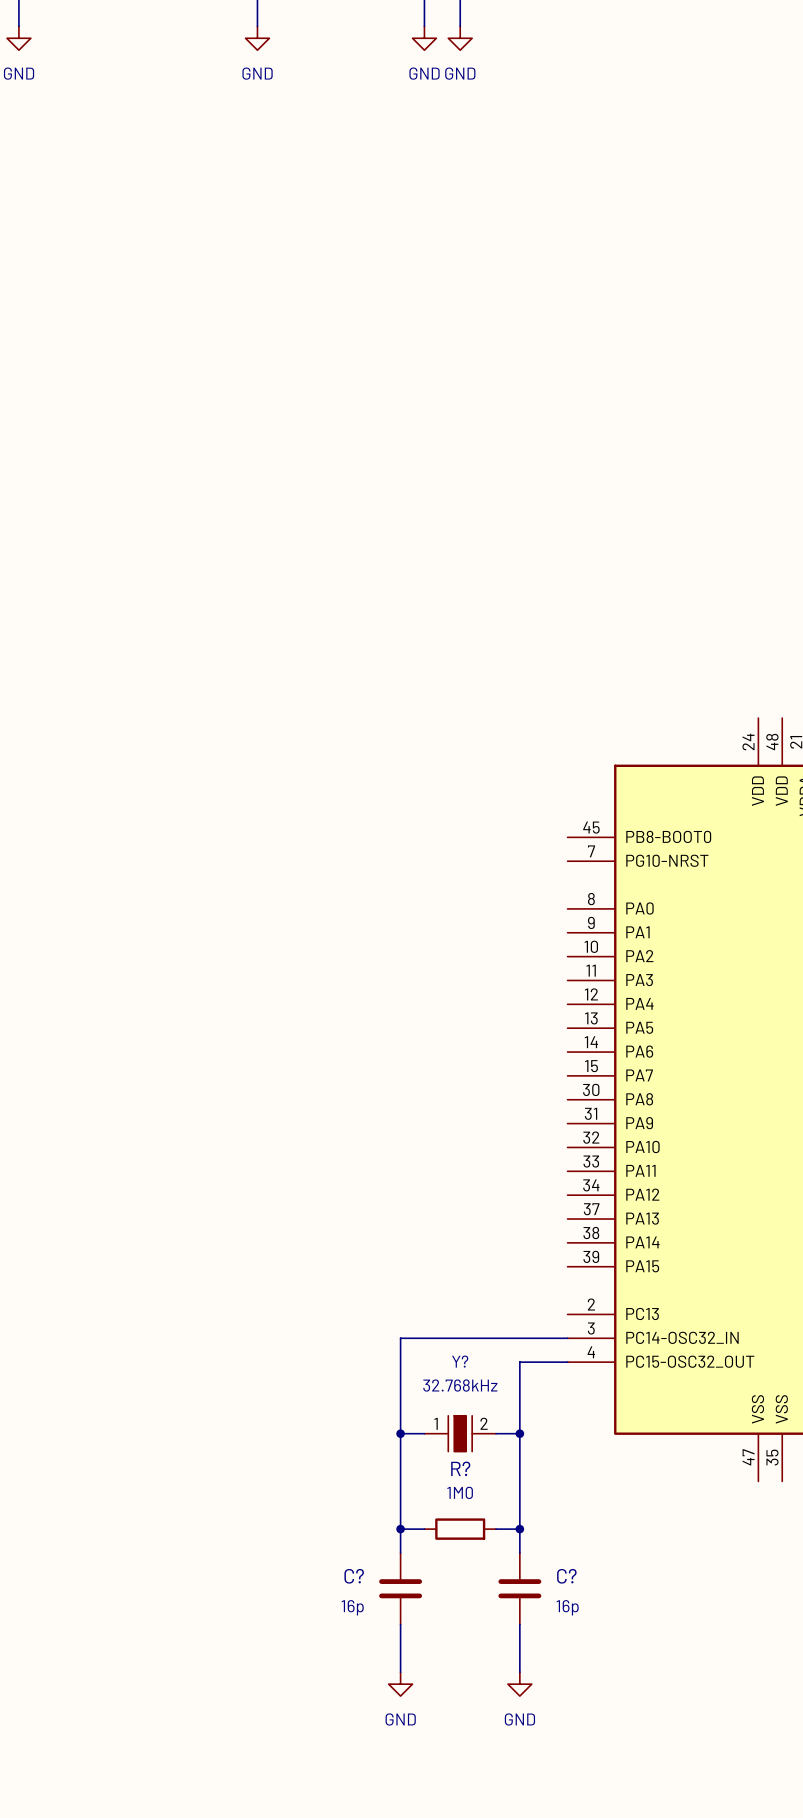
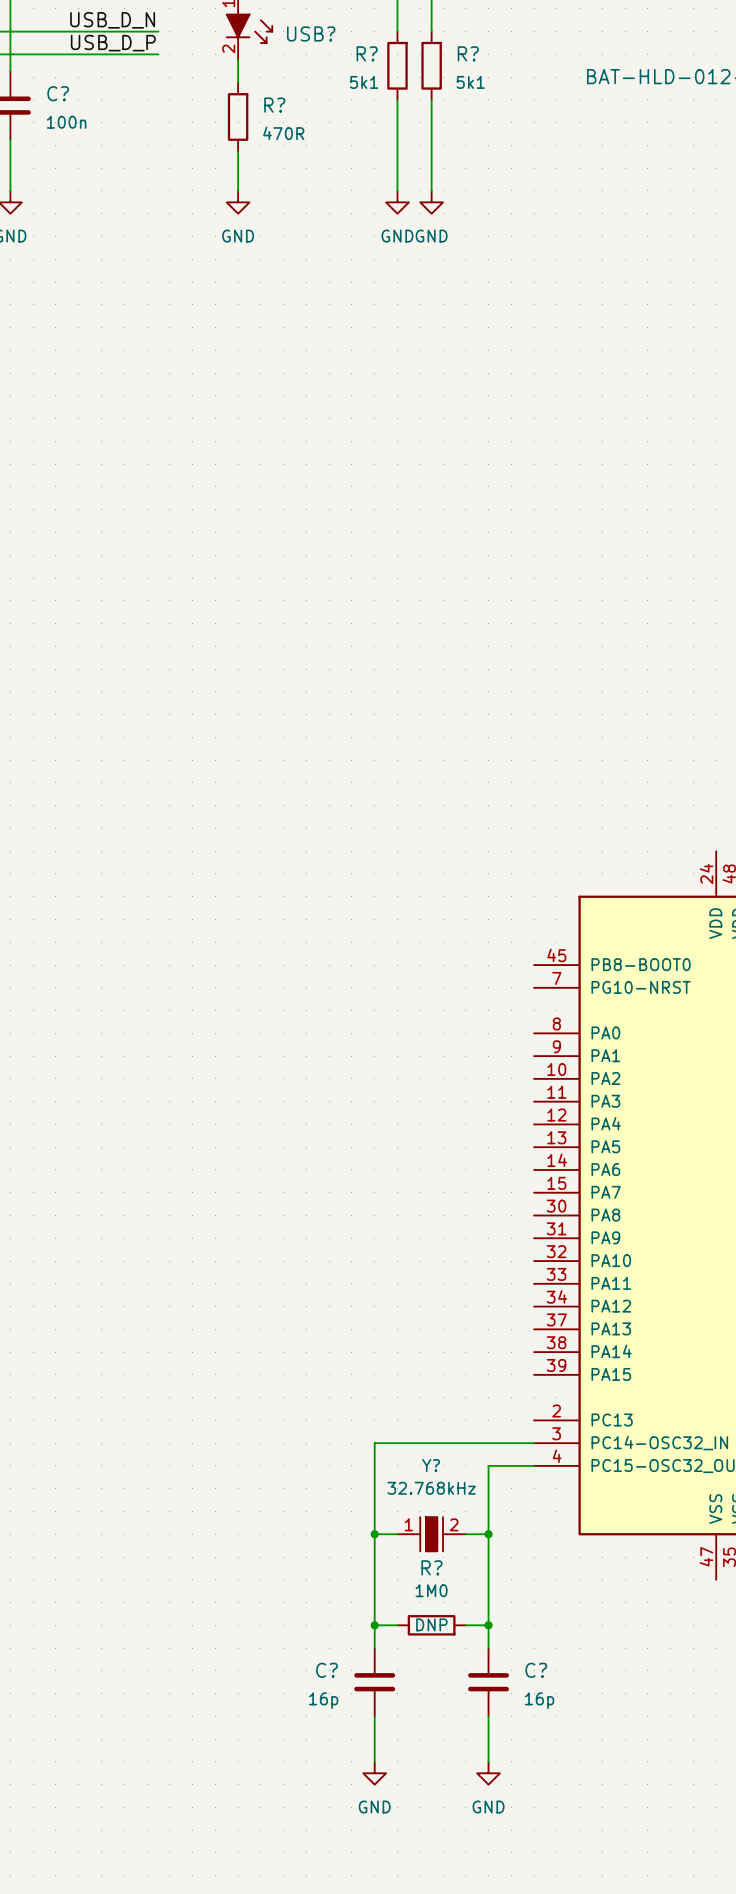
R? text: none -> DNP (431, 1624)

